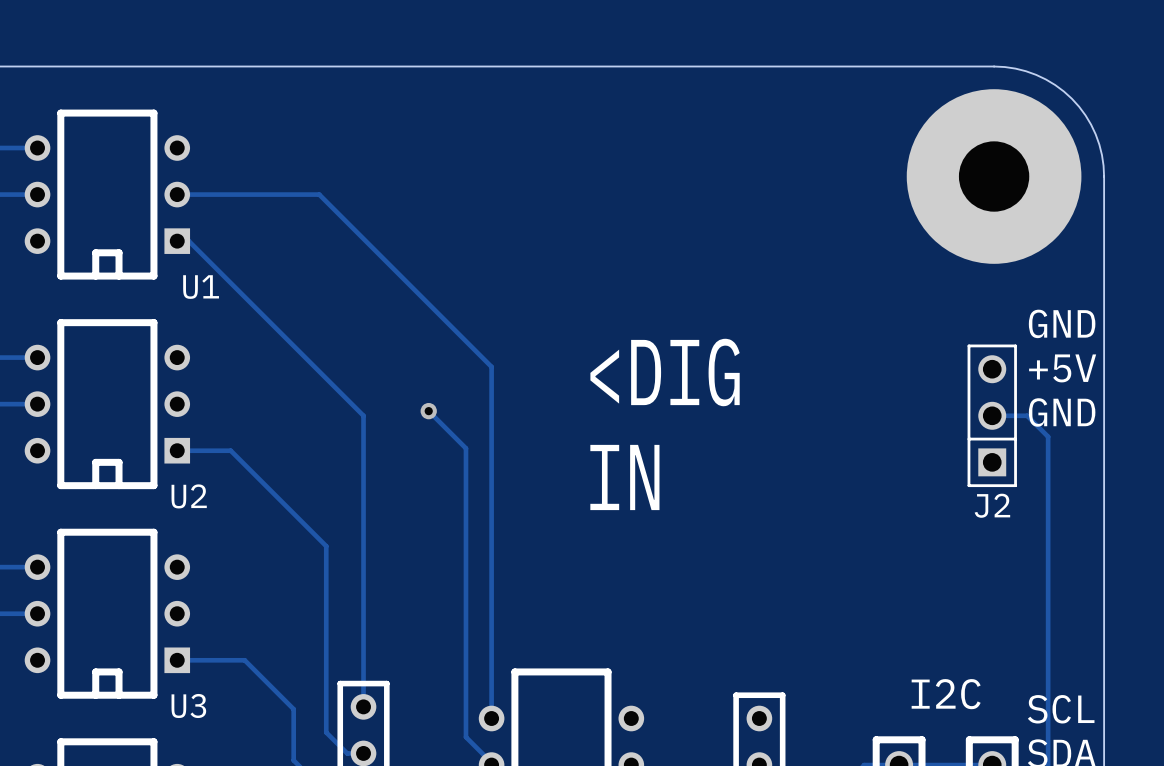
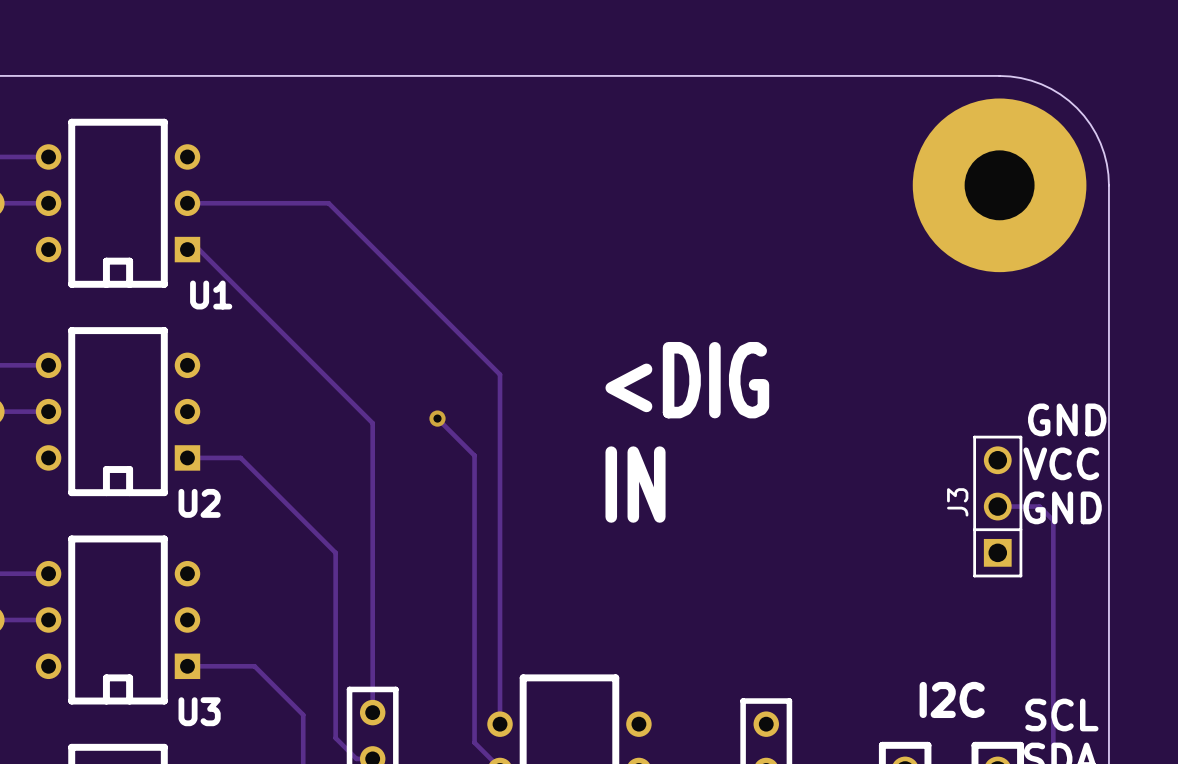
text position: GND (1062, 323) -> GND (1062, 507)
text: +5V (1062, 368) -> none
track: (992, 415) (1027, 415) (1048, 436) (1048, 513) -> (997, 506) (1039, 506) (1053, 520)
J2: (992, 415) -> none
text: none -> VCC (1061, 463)
J3: none -> (997, 506)

